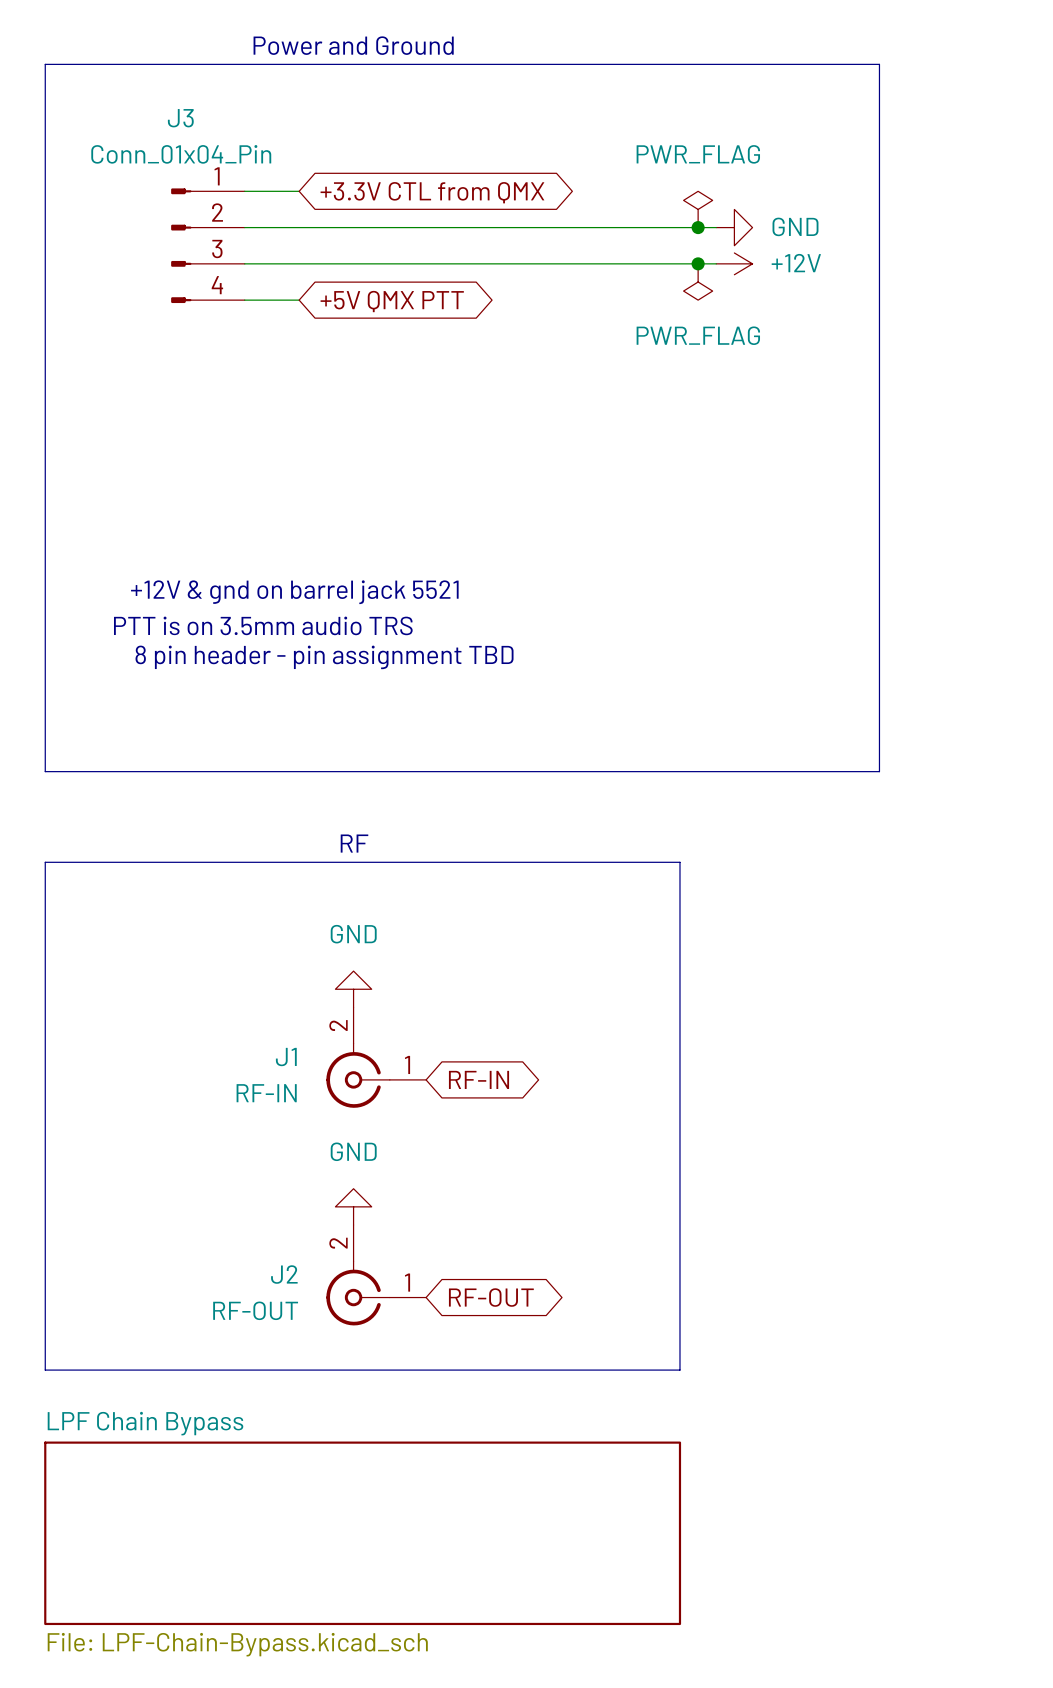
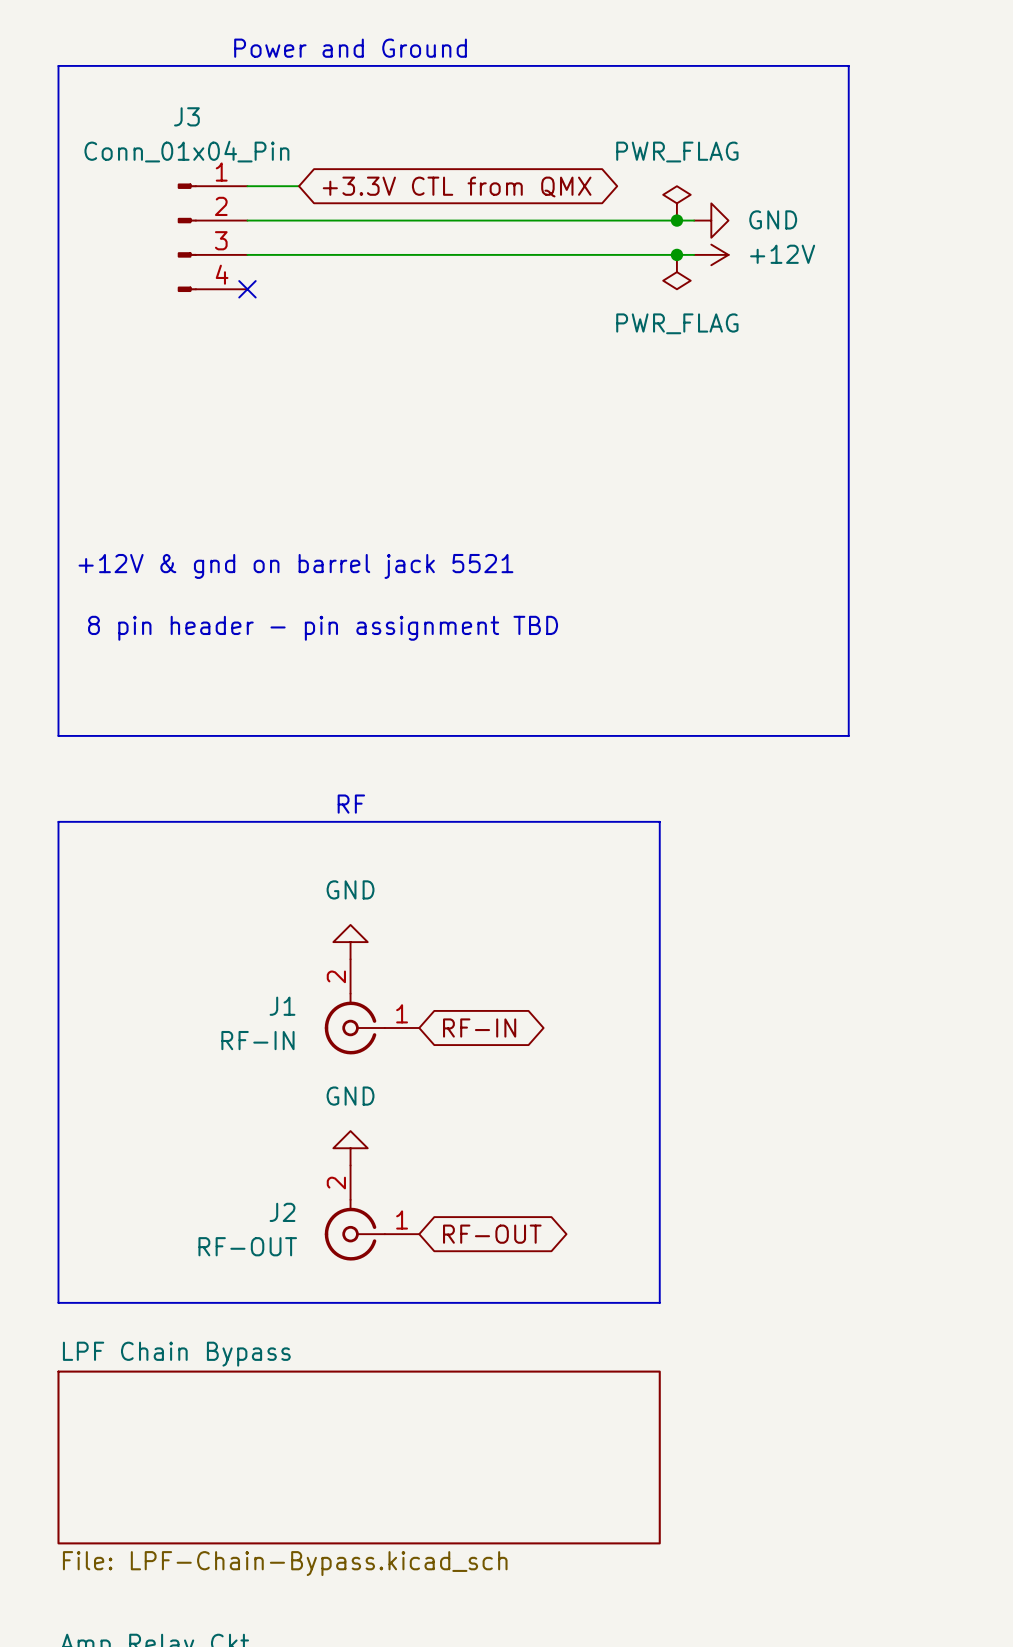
wire: (244, 300) (299, 300) -> none
no-connect mark: none -> (247, 289)
global label: +5V QMX PTT (392, 301) -> none
text: PTT is on 3.5mm audio TRS (263, 625) -> none

